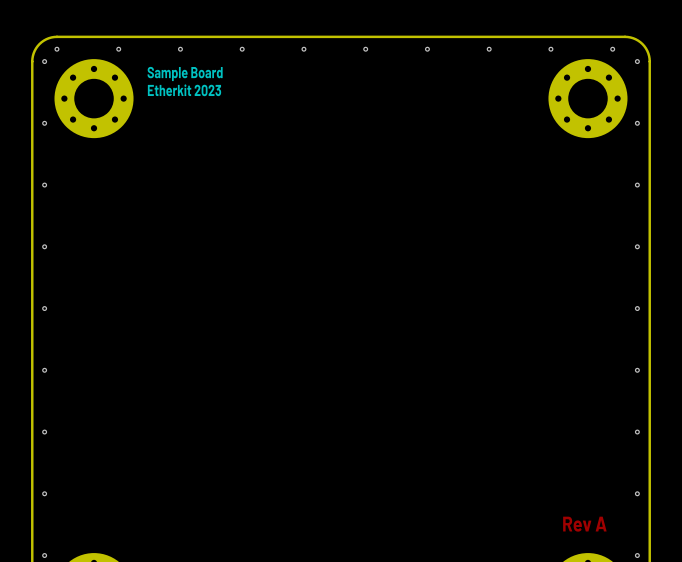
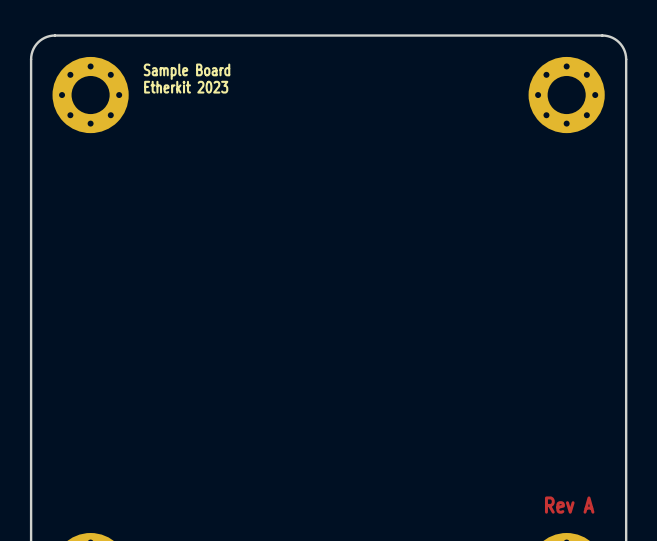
via: (56, 49) -> none
via: (118, 49) -> none
via: (180, 49) -> none
via: (242, 49) -> none
via: (303, 49) -> none
via: (365, 49) -> none
via: (427, 49) -> none
via: (489, 49) -> none
via: (550, 49) -> none
via: (612, 49) -> none
via: (44, 61) -> none
via: (637, 61) -> none
via: (44, 123) -> none
via: (637, 123) -> none
via: (44, 185) -> none
via: (637, 185) -> none
via: (44, 246) -> none
via: (637, 246) -> none
via: (44, 308) -> none
via: (637, 308) -> none
via: (44, 370) -> none
via: (637, 370) -> none
via: (44, 432) -> none
via: (637, 432) -> none
via: (44, 493) -> none
via: (637, 493) -> none
via: (44, 555) -> none
via: (637, 555) -> none

